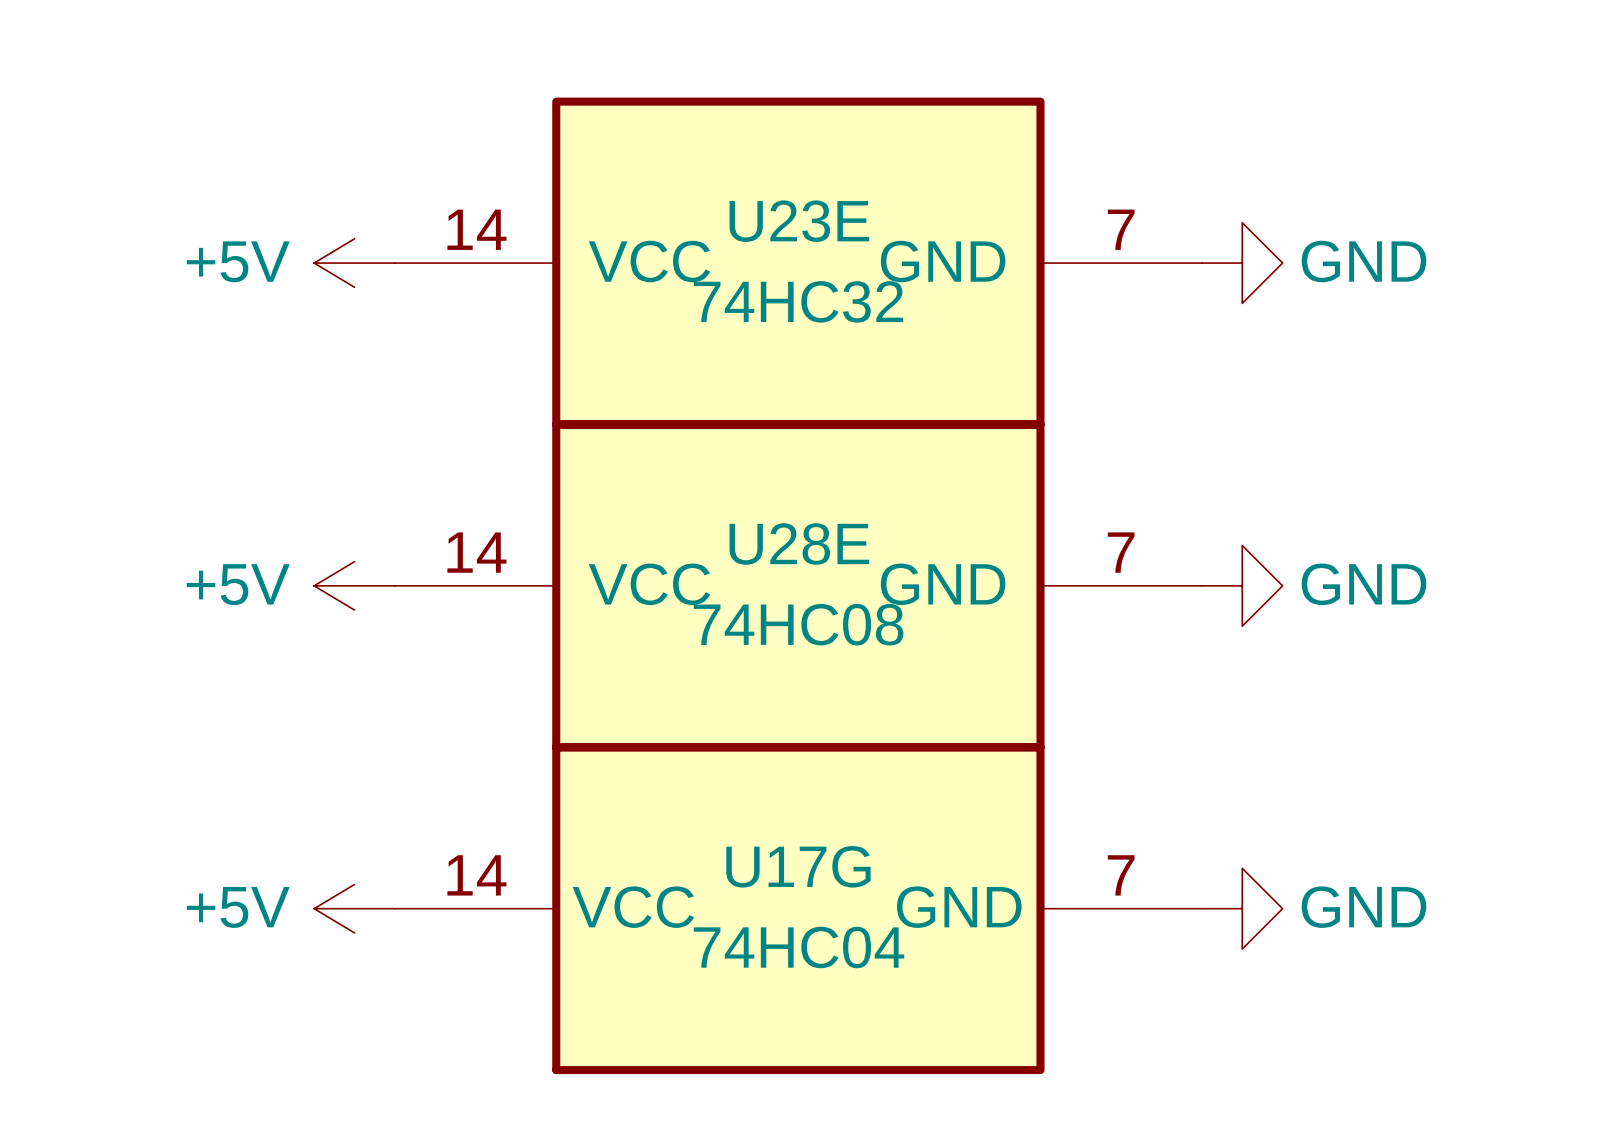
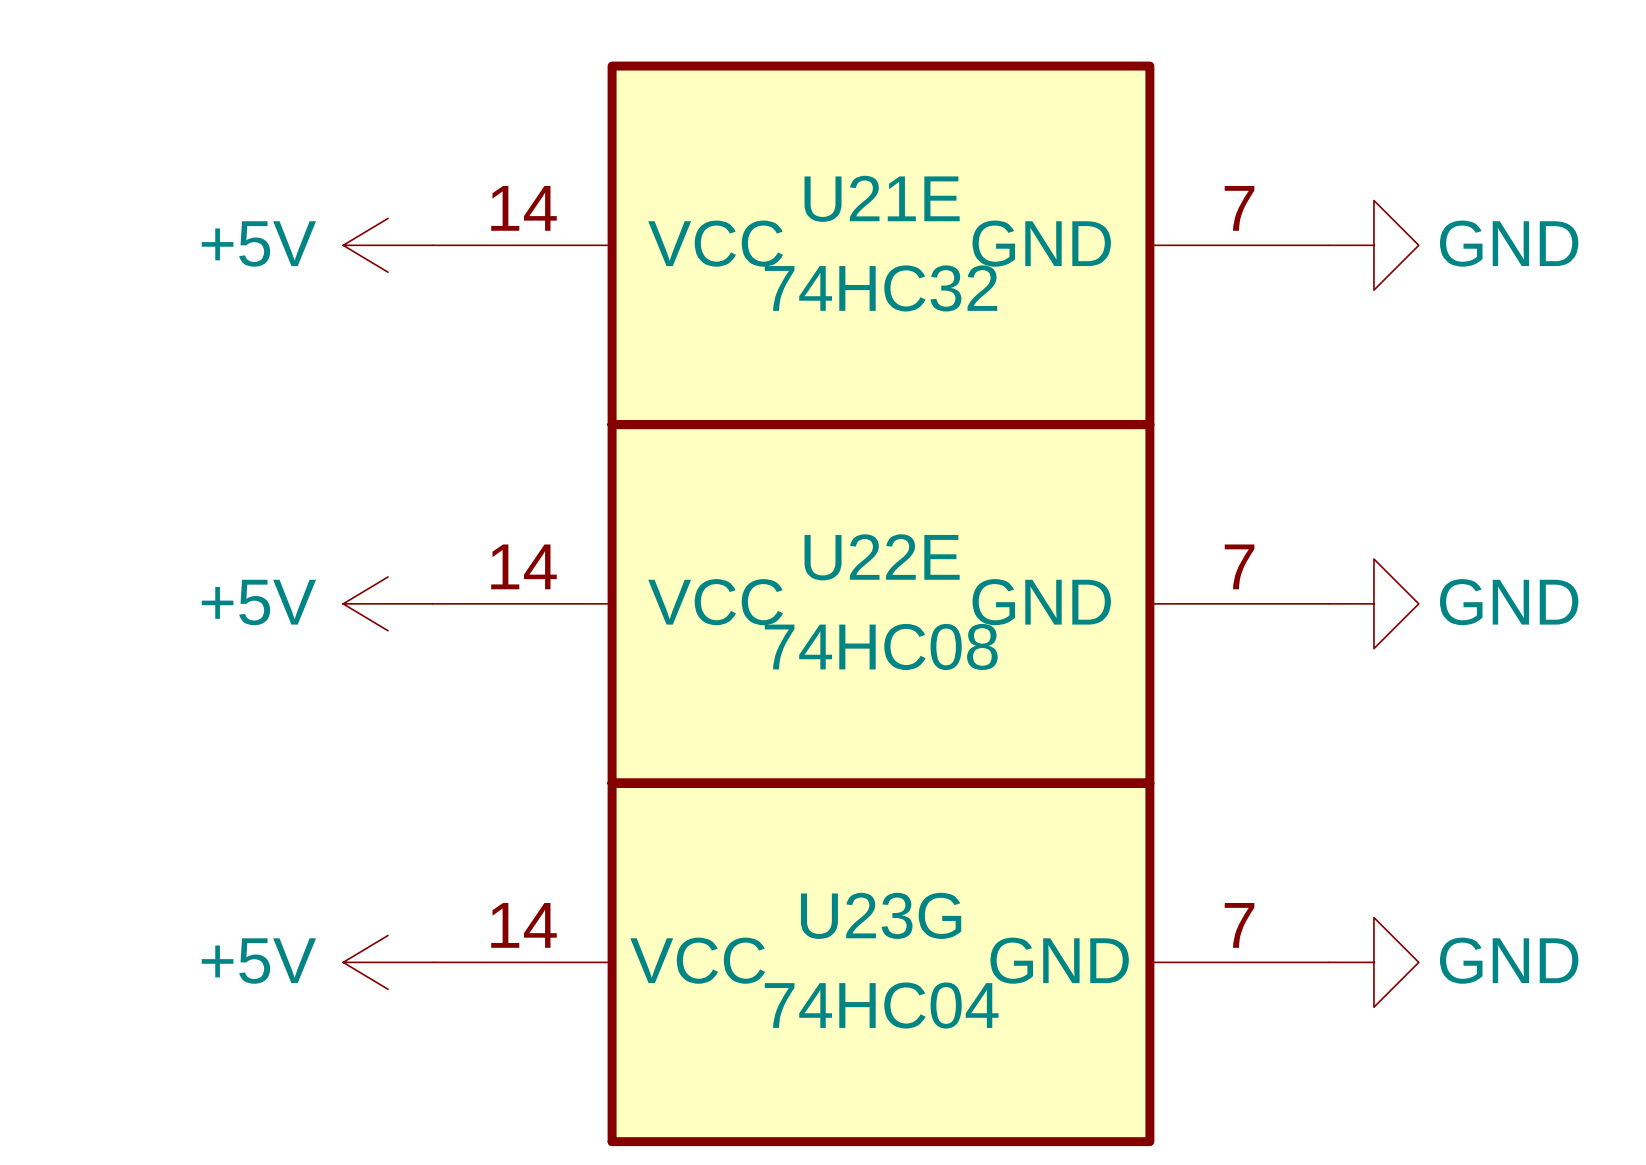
U23E name: U23E (799, 221) -> U21E (882, 198)
U28E name: U28E (799, 543) -> U22E (882, 557)
U17G name: U17G (798, 866) -> U23G (881, 915)

